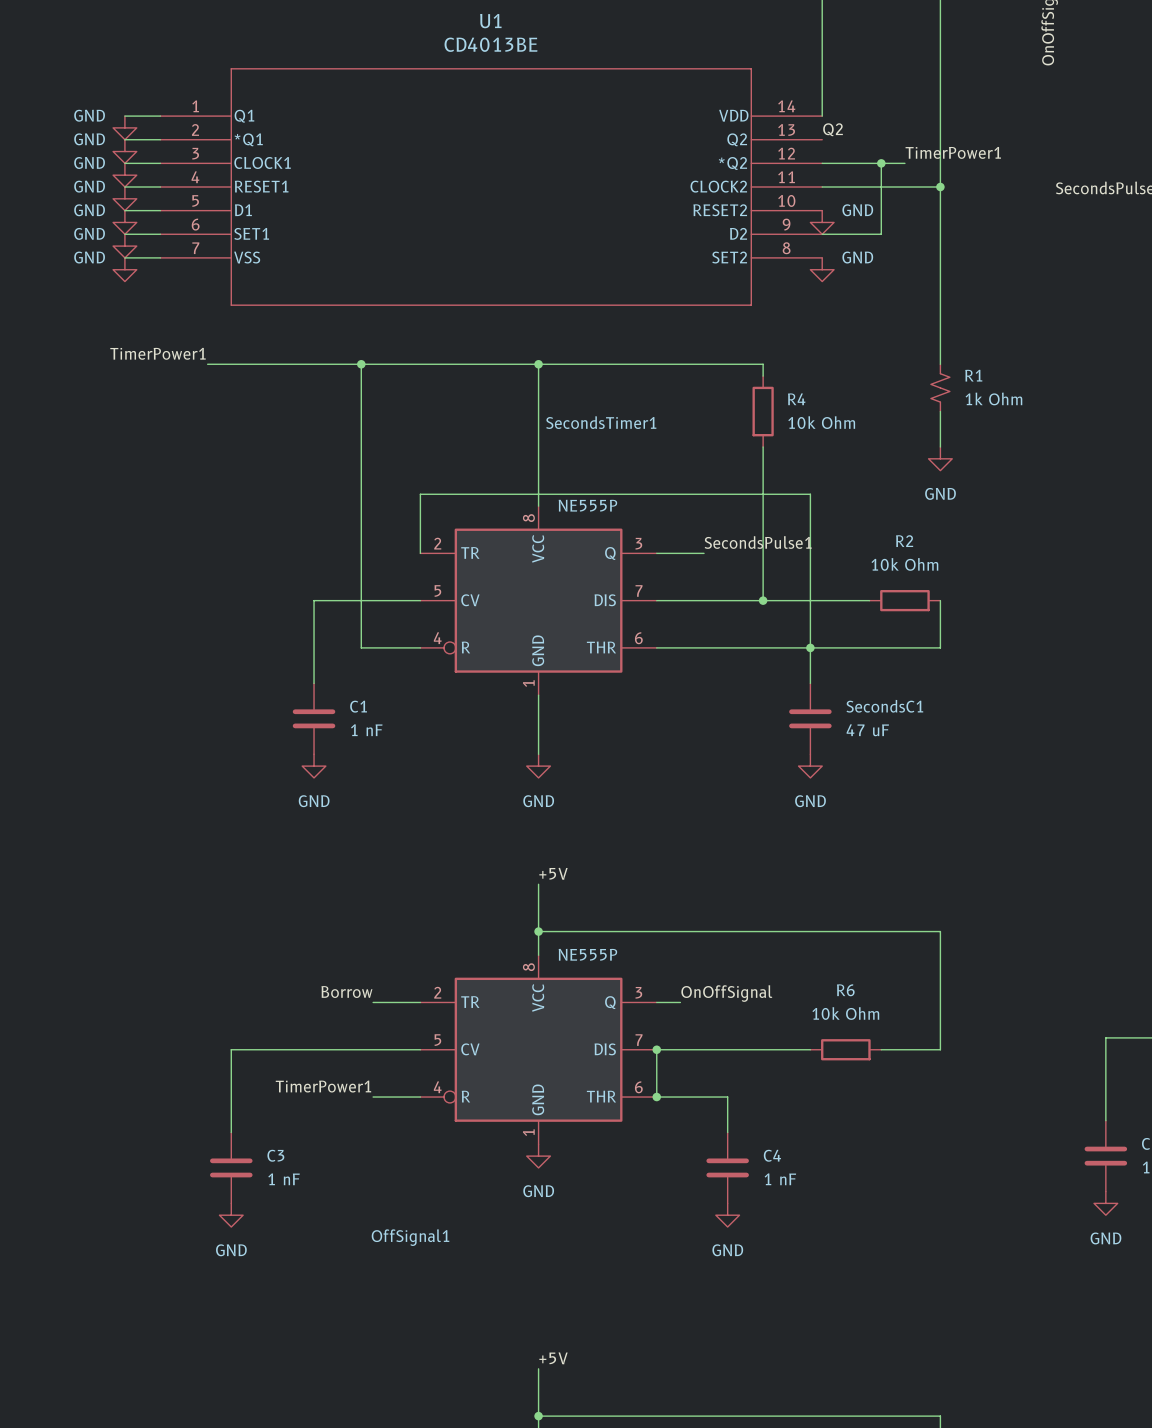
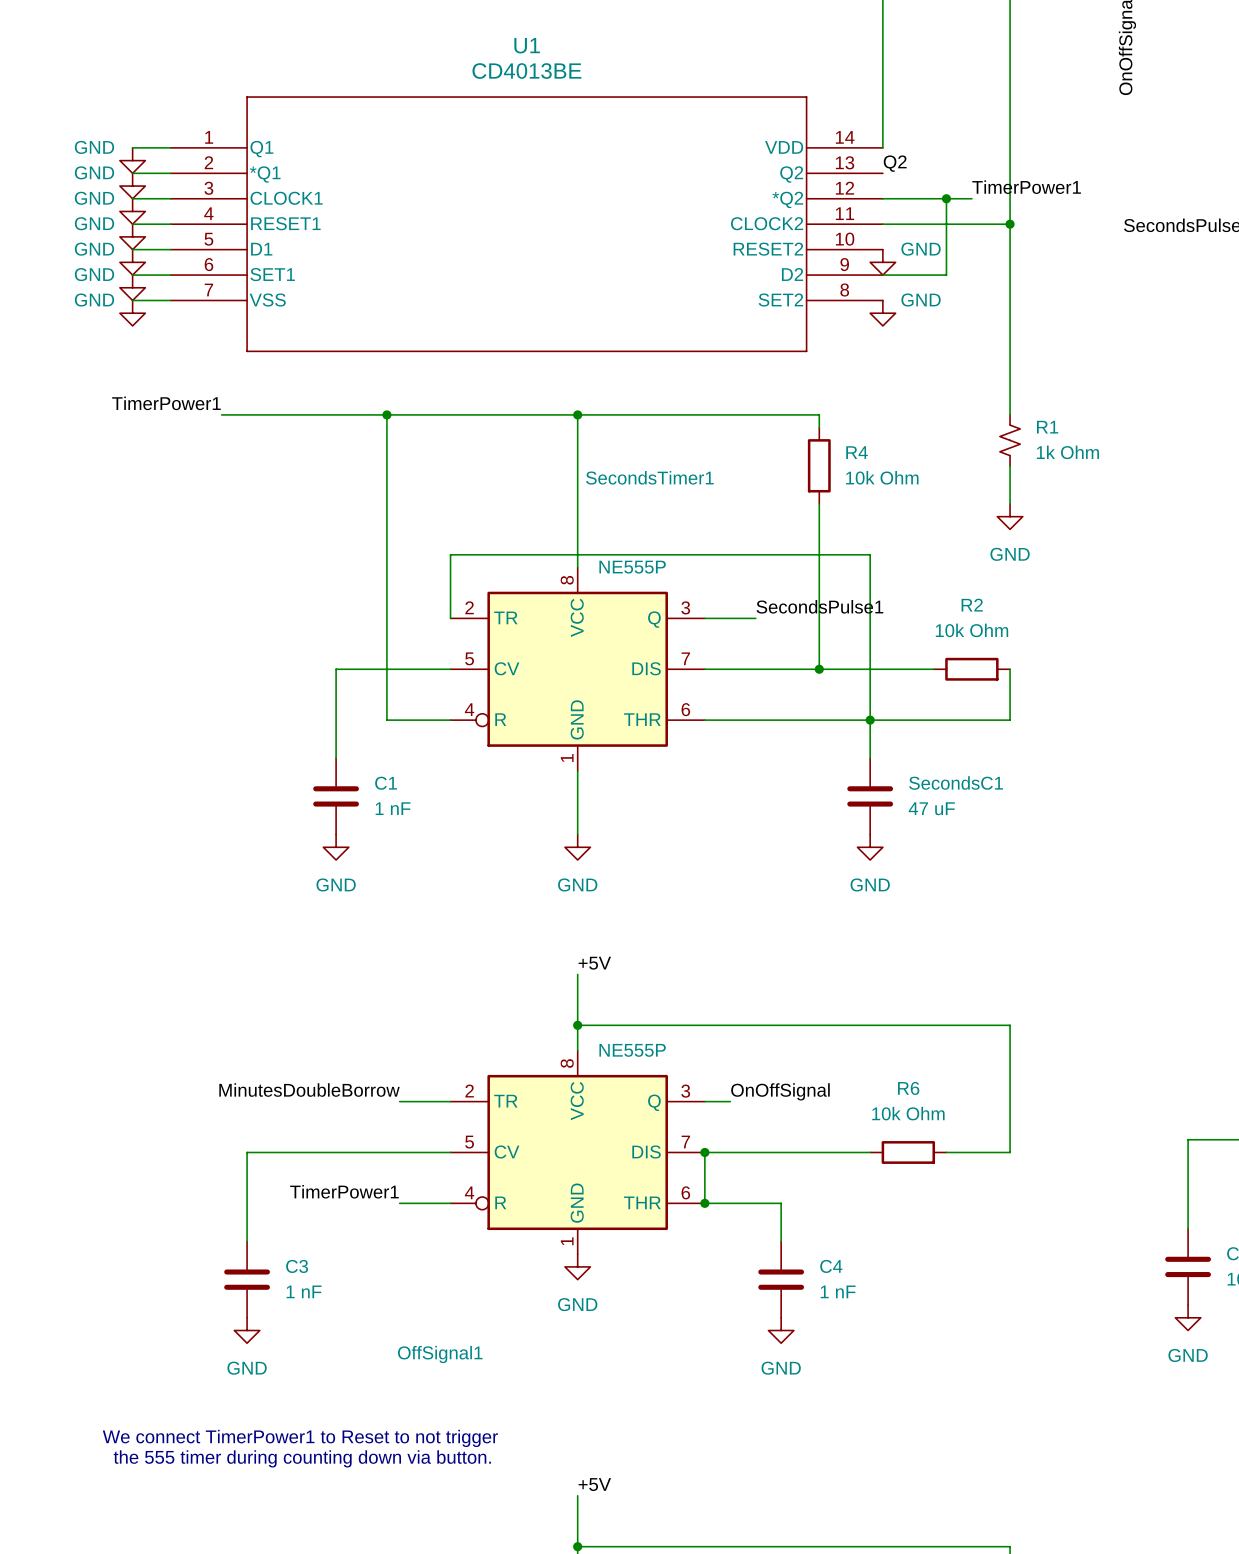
label: Borrow (346, 992) -> MinutesDoubleBorrow (309, 1090)
text: none -> We connect TimerPower1 to Reset to not trigger (300, 1438)
text: none -> the 555 timer during counting down via button. (302, 1458)

